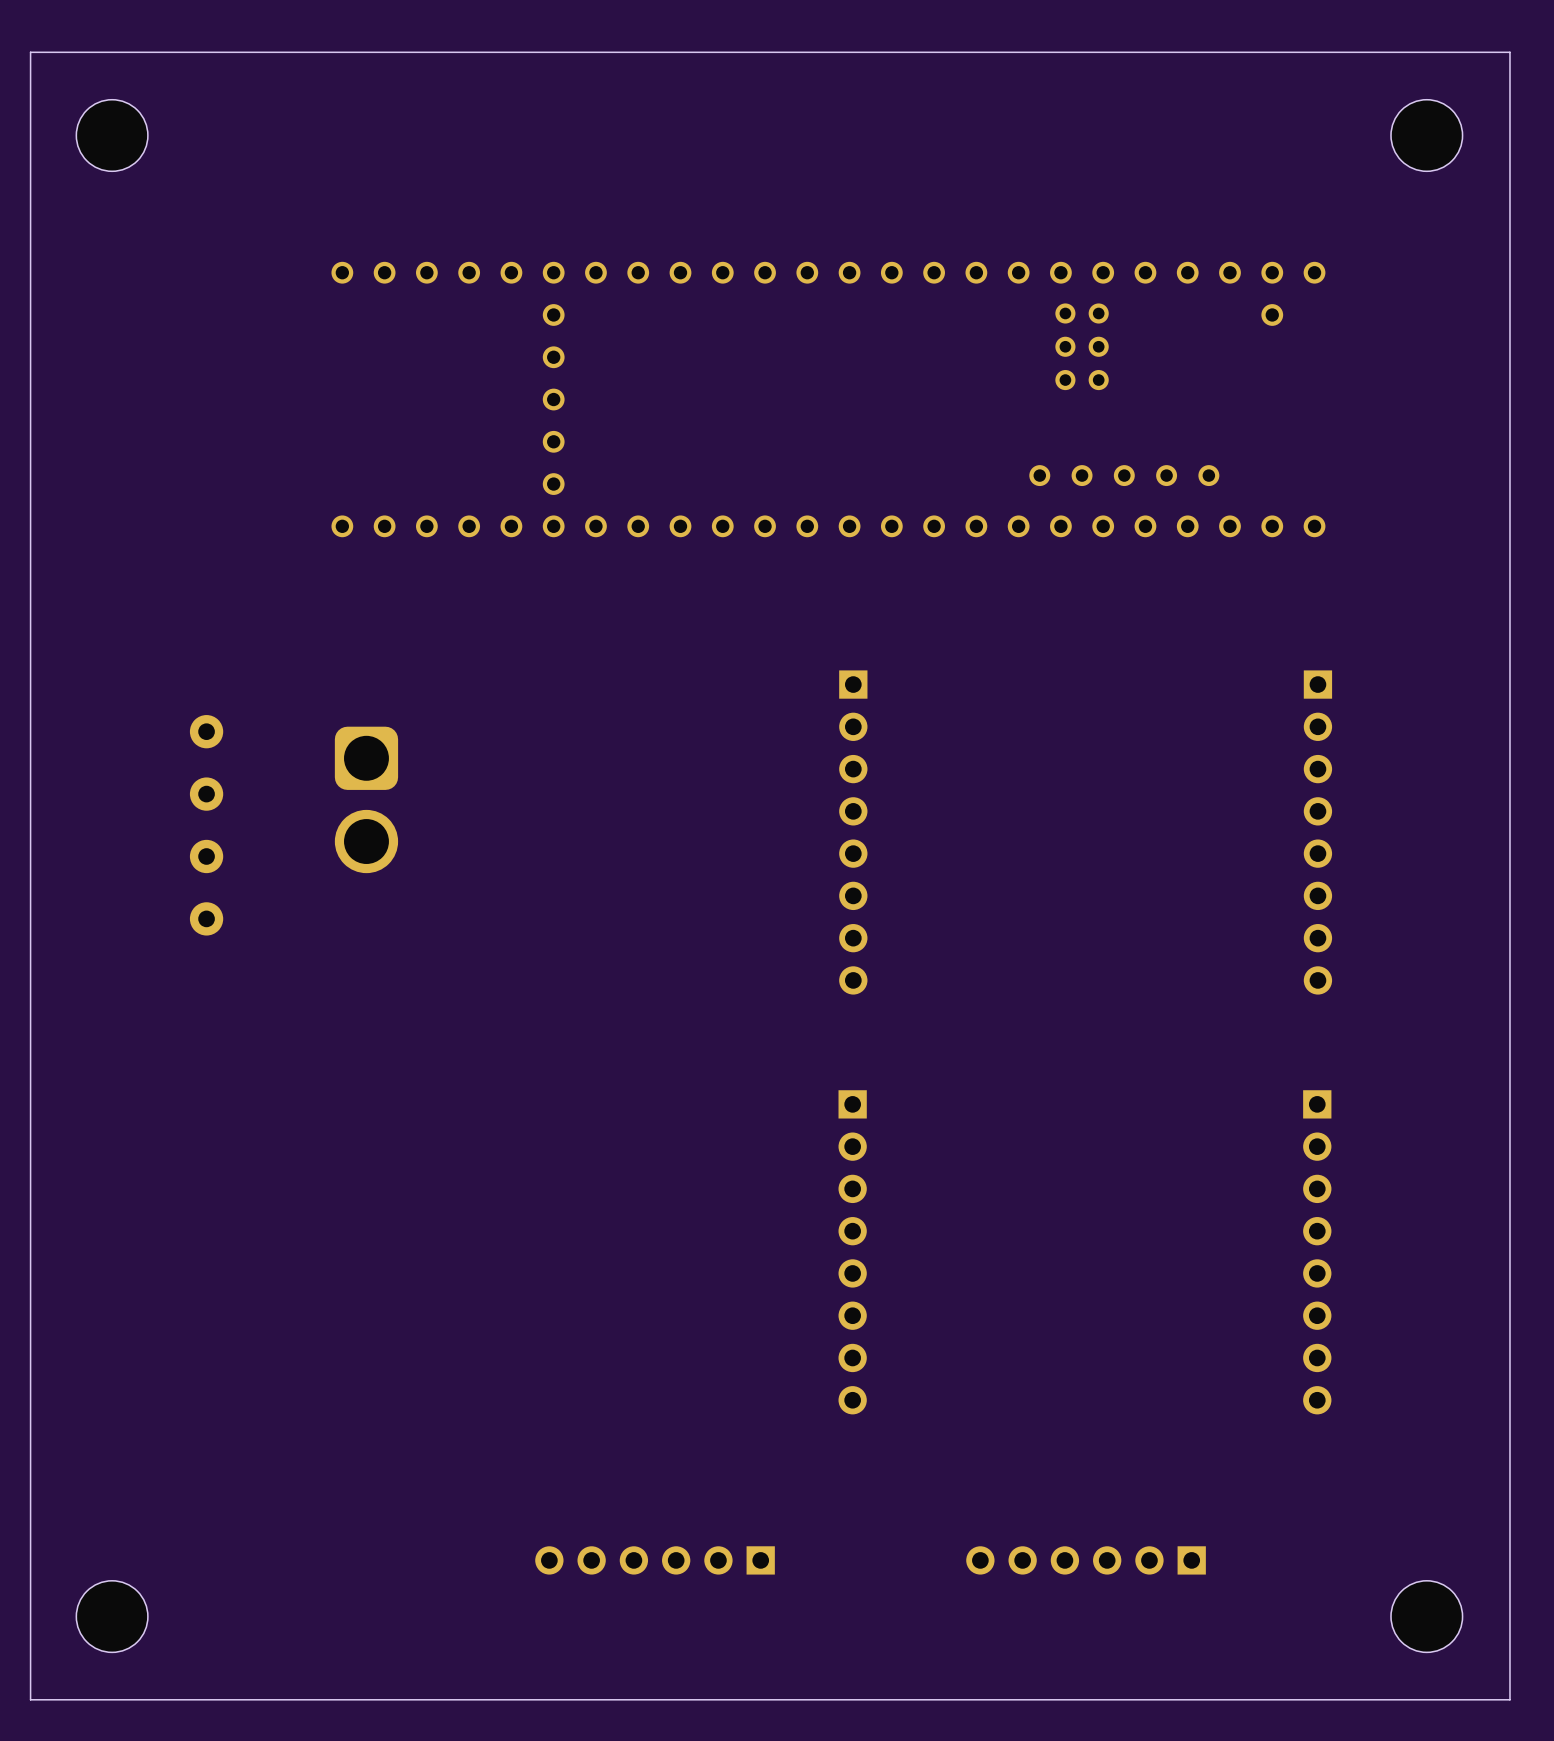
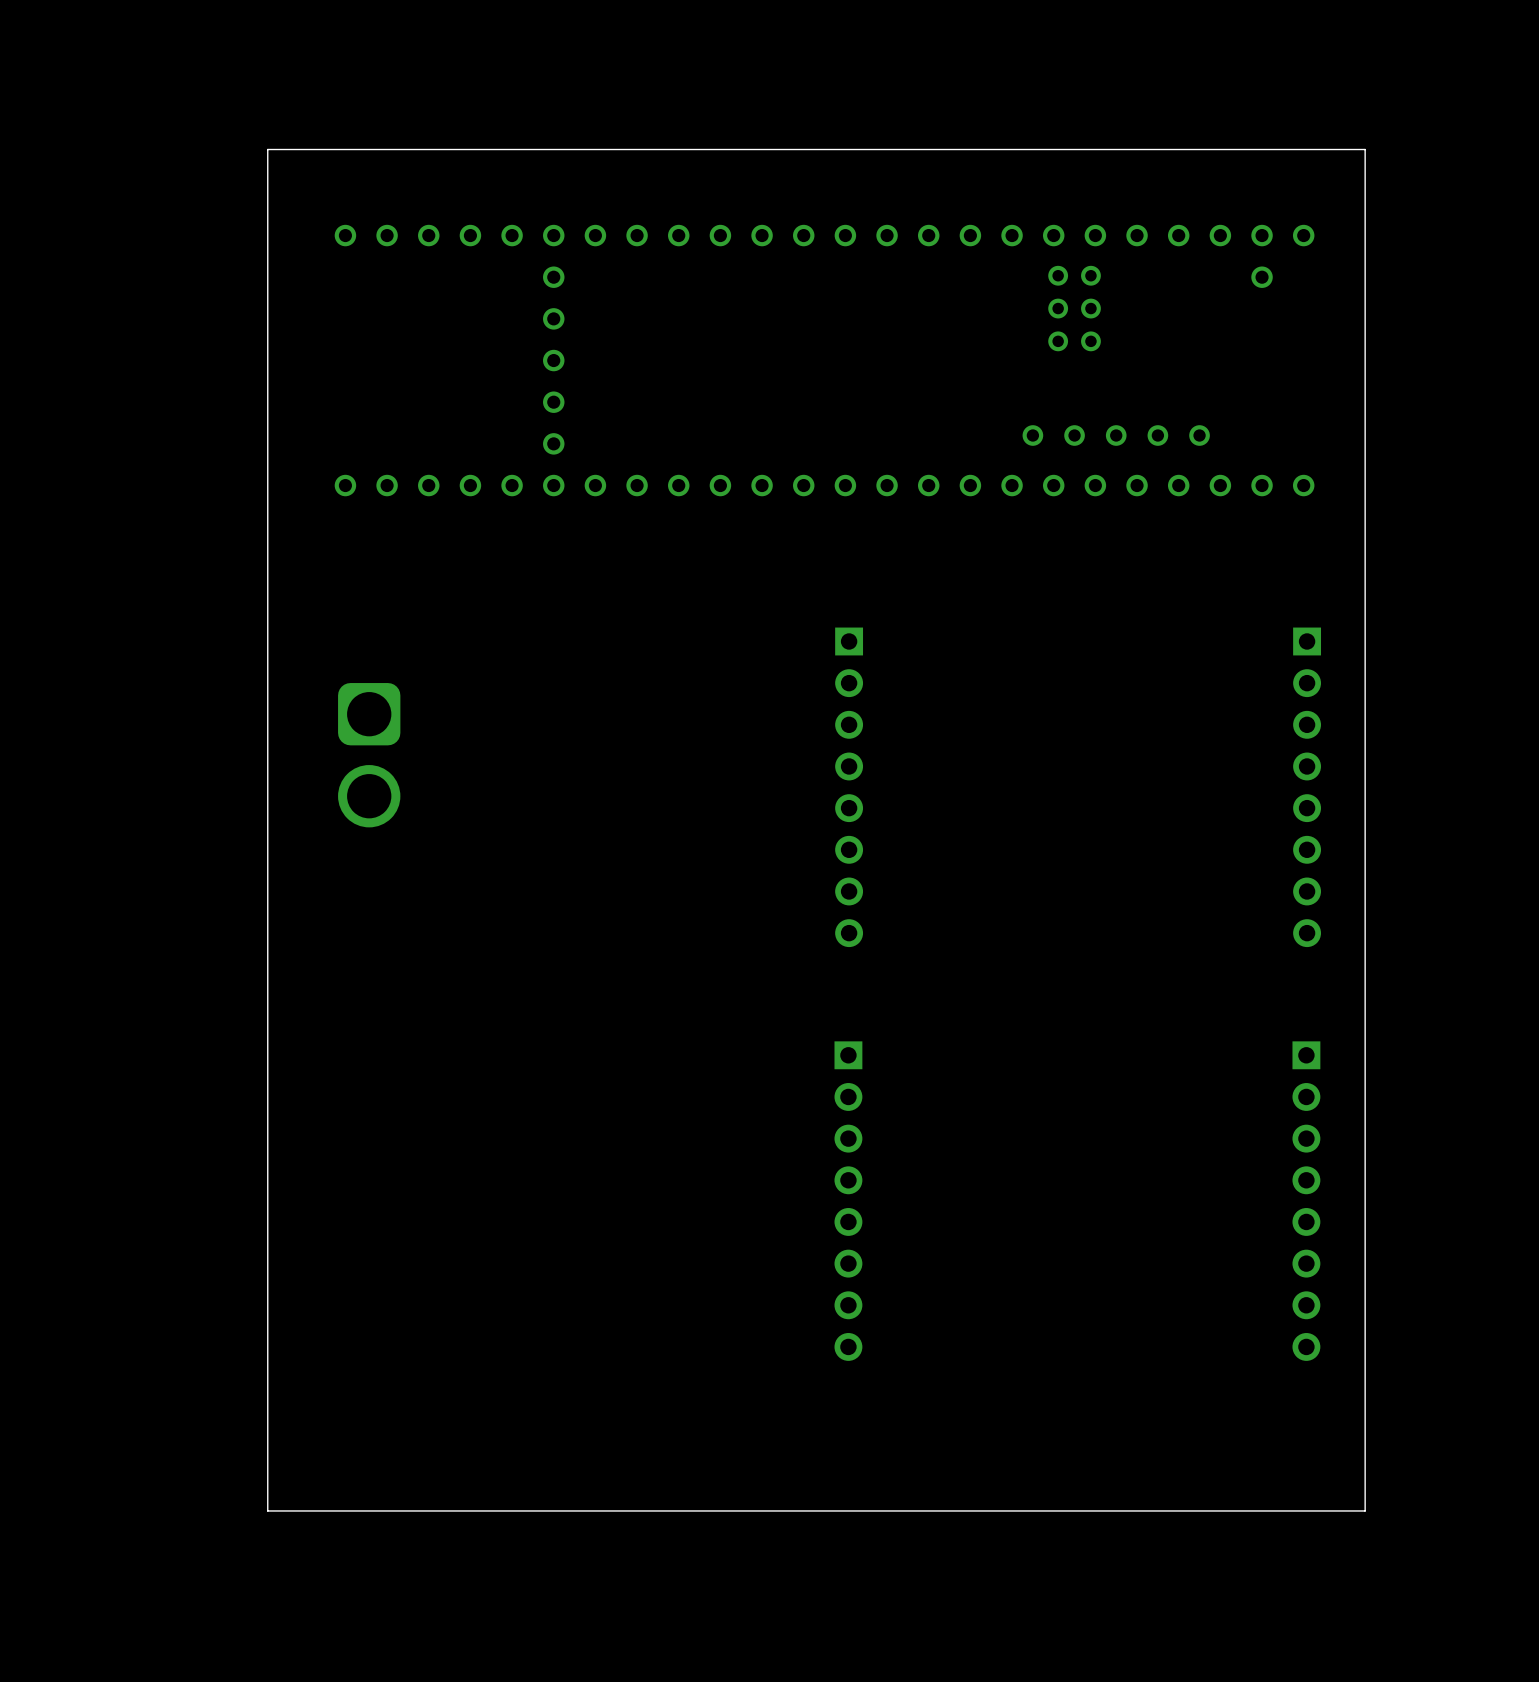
board edge: (1509, 52) (30, 52) (30, 1699) (1509, 1699) (1509, 52) -> (1365, 149) (1365, 1510) (267, 1510) (267, 149) (1365, 149)
part: (112, 135) -> none
part: (1426, 135) -> none
part: (206, 731) -> none
part: (206, 794) -> none
part: (206, 856) -> none
part: (206, 918) -> none
part: (655, 1560) -> none
part: (1086, 1560) -> none
part: (112, 1616) -> none
part: (1426, 1616) -> none

